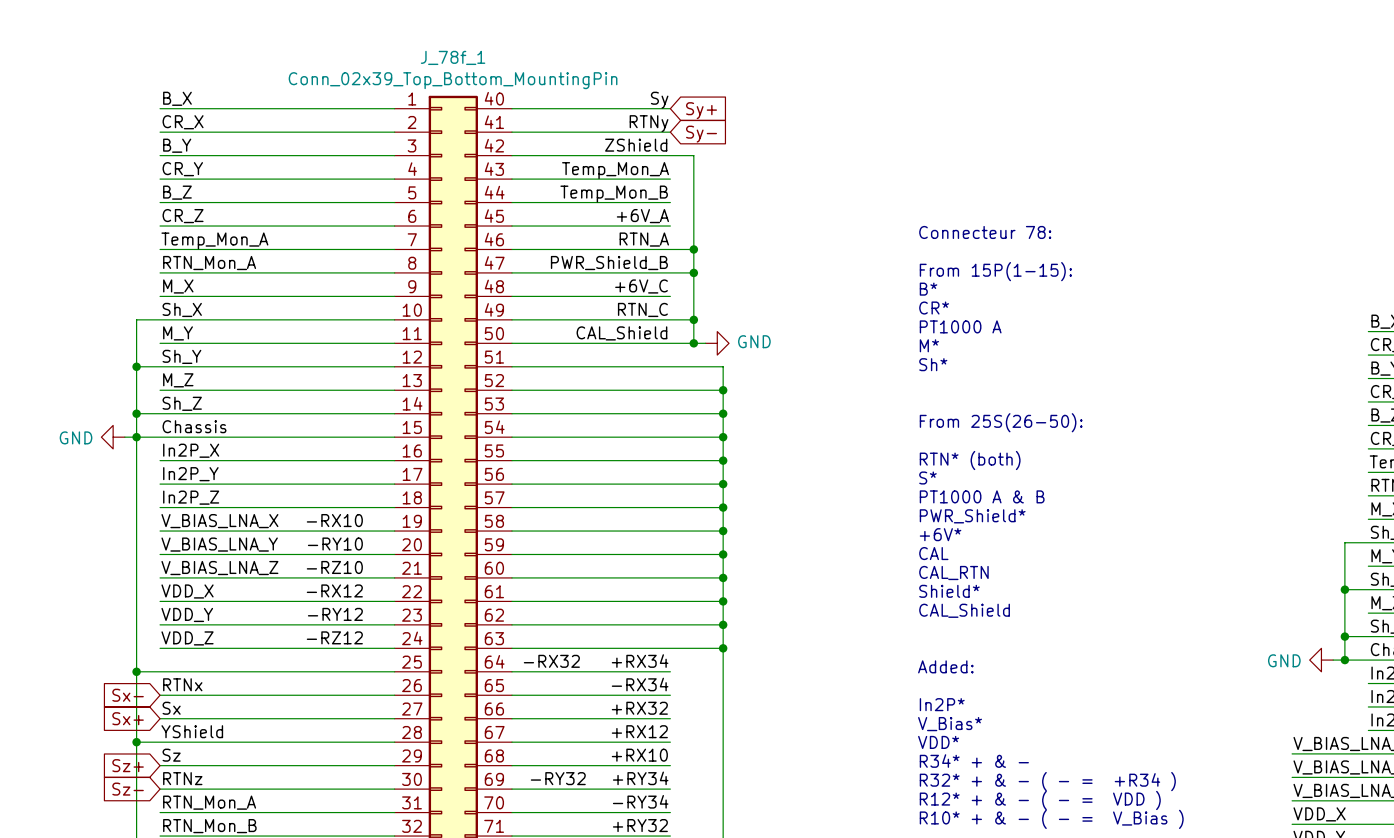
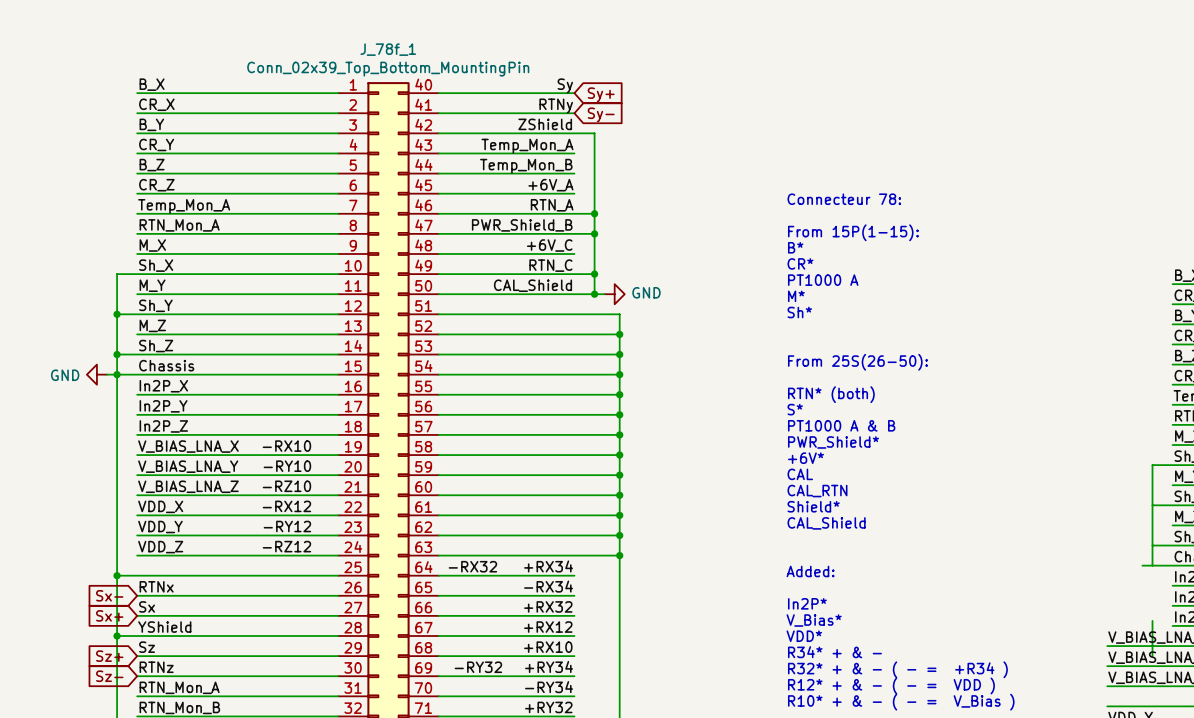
junction: (1344, 589) -> none
junction: (1344, 636) -> none
power symbol: GND (1321, 660) -> none
junction: (1344, 660) -> none
wire: none -> (1152, 620) (1152, 656)
label: VDD_X (1319, 814) -> none

